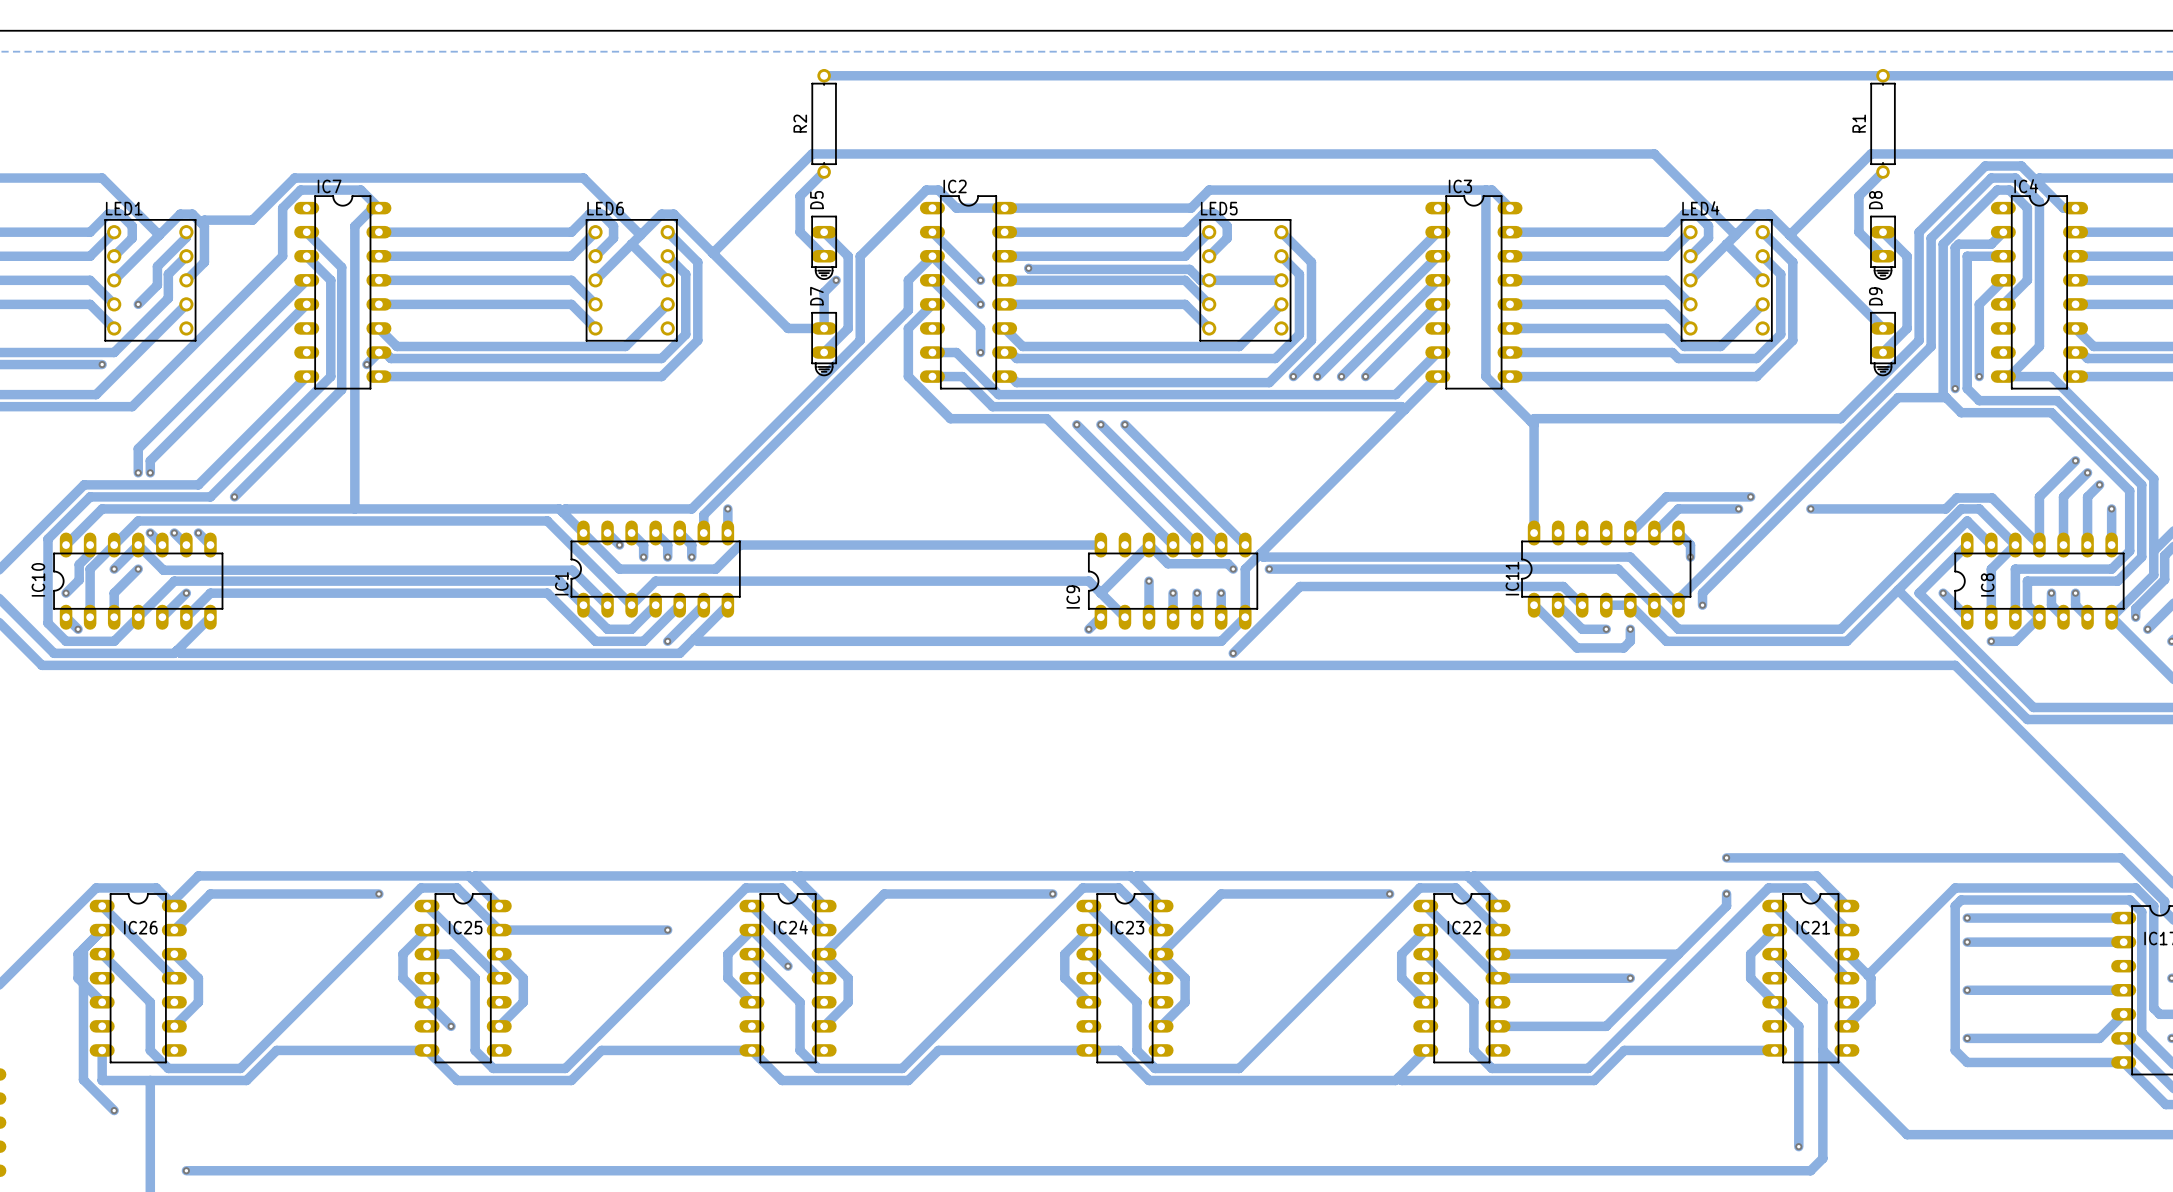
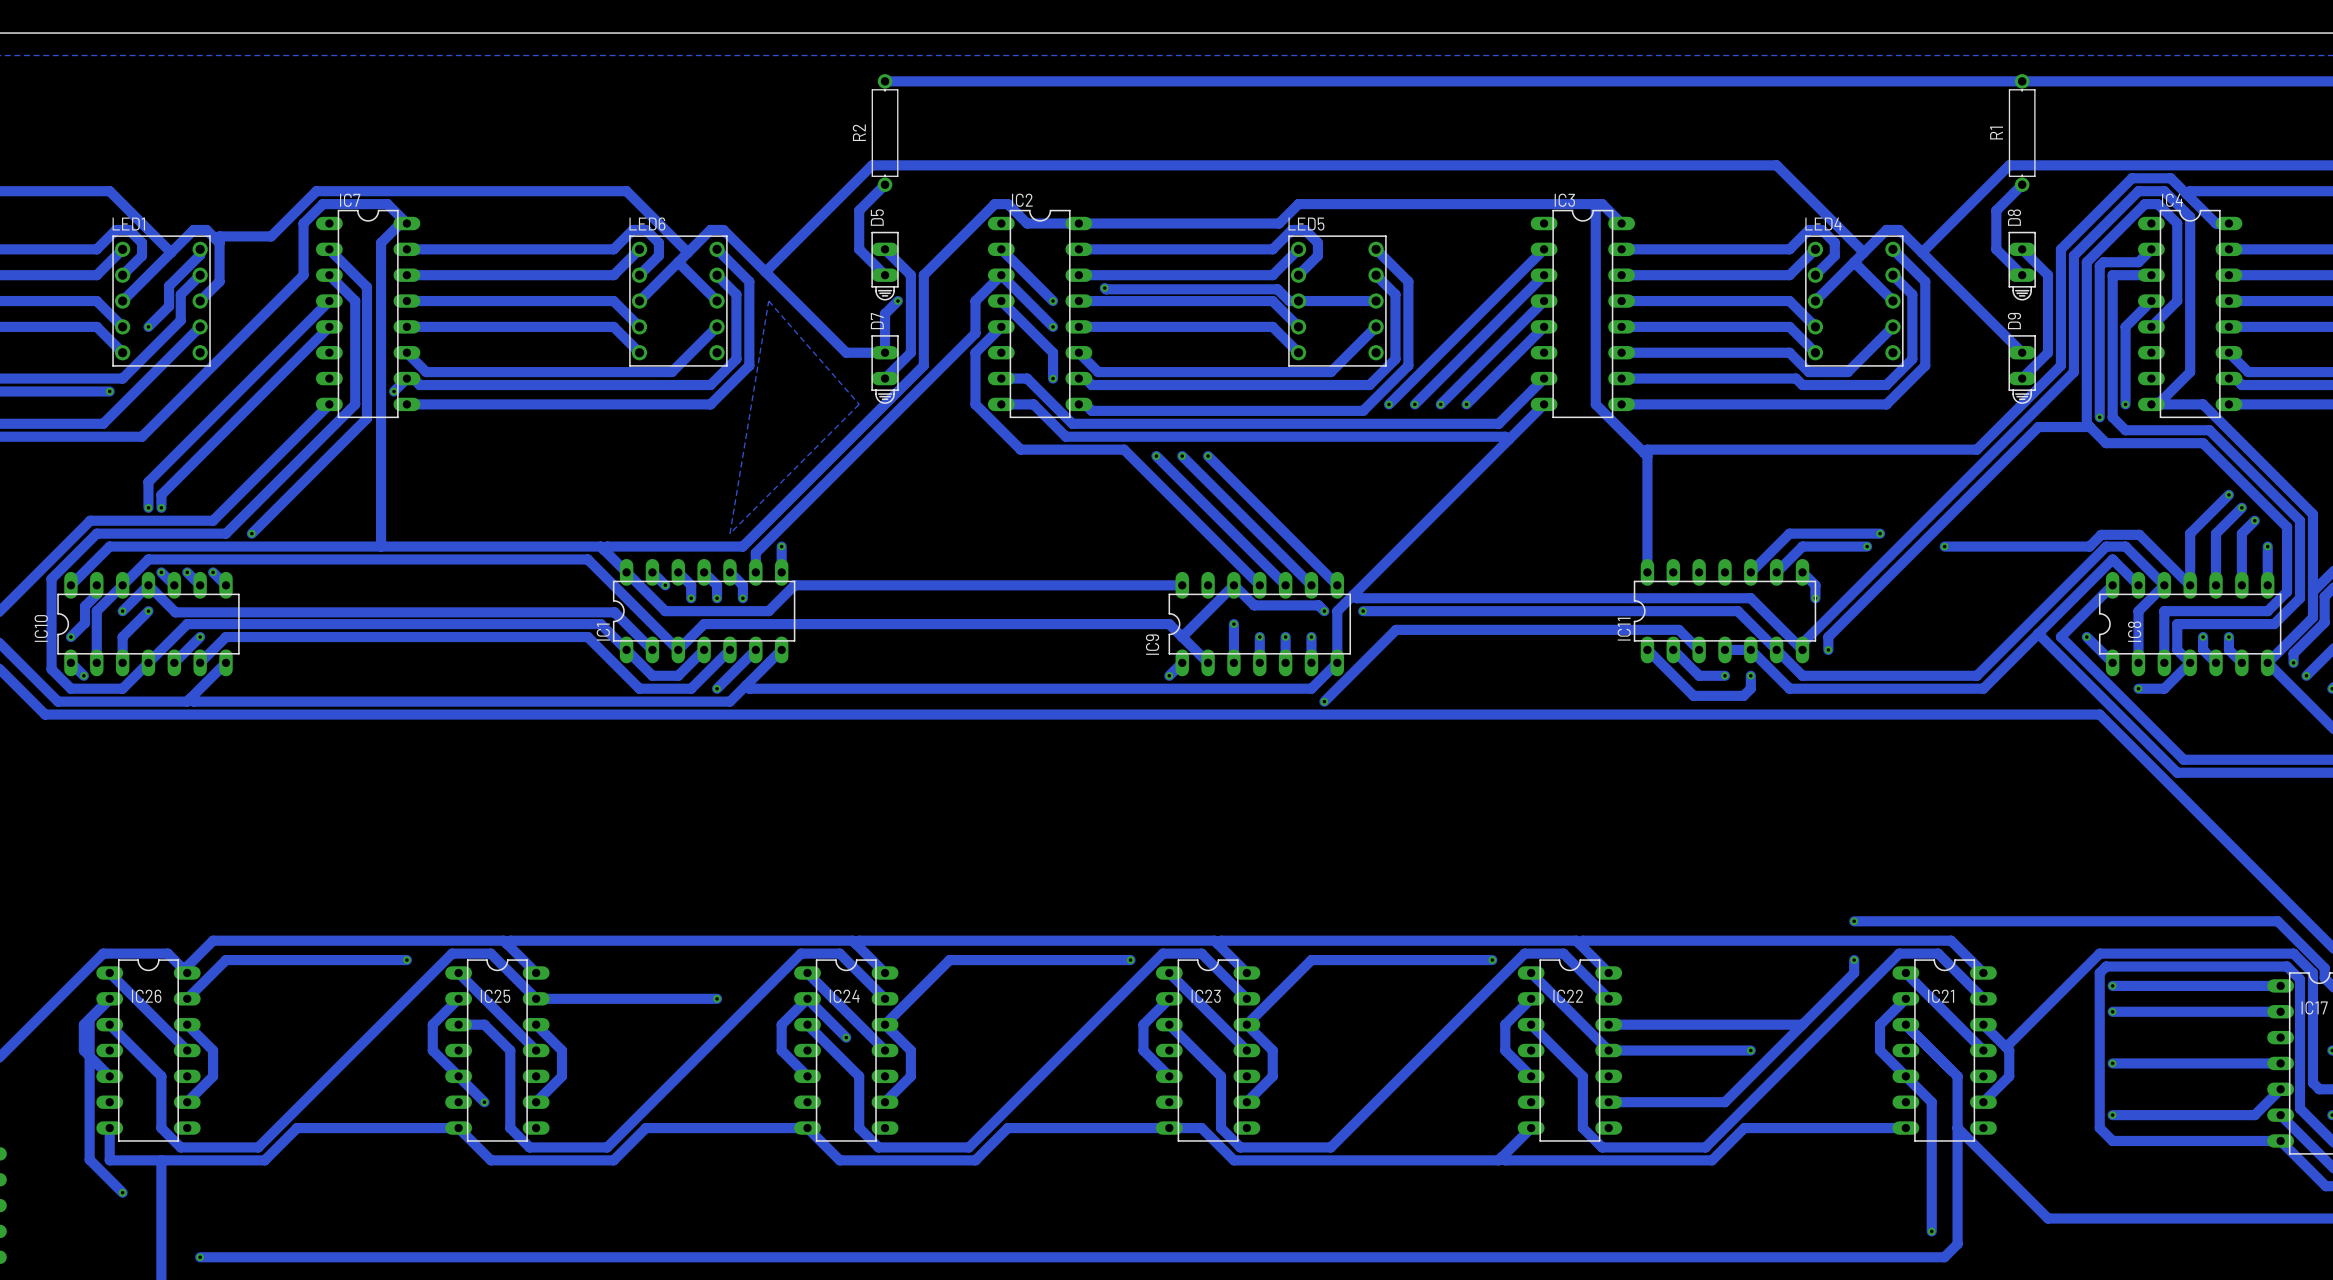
bottom zone outline: none -> (768, 301) (859, 404) (729, 533) (768, 301)

